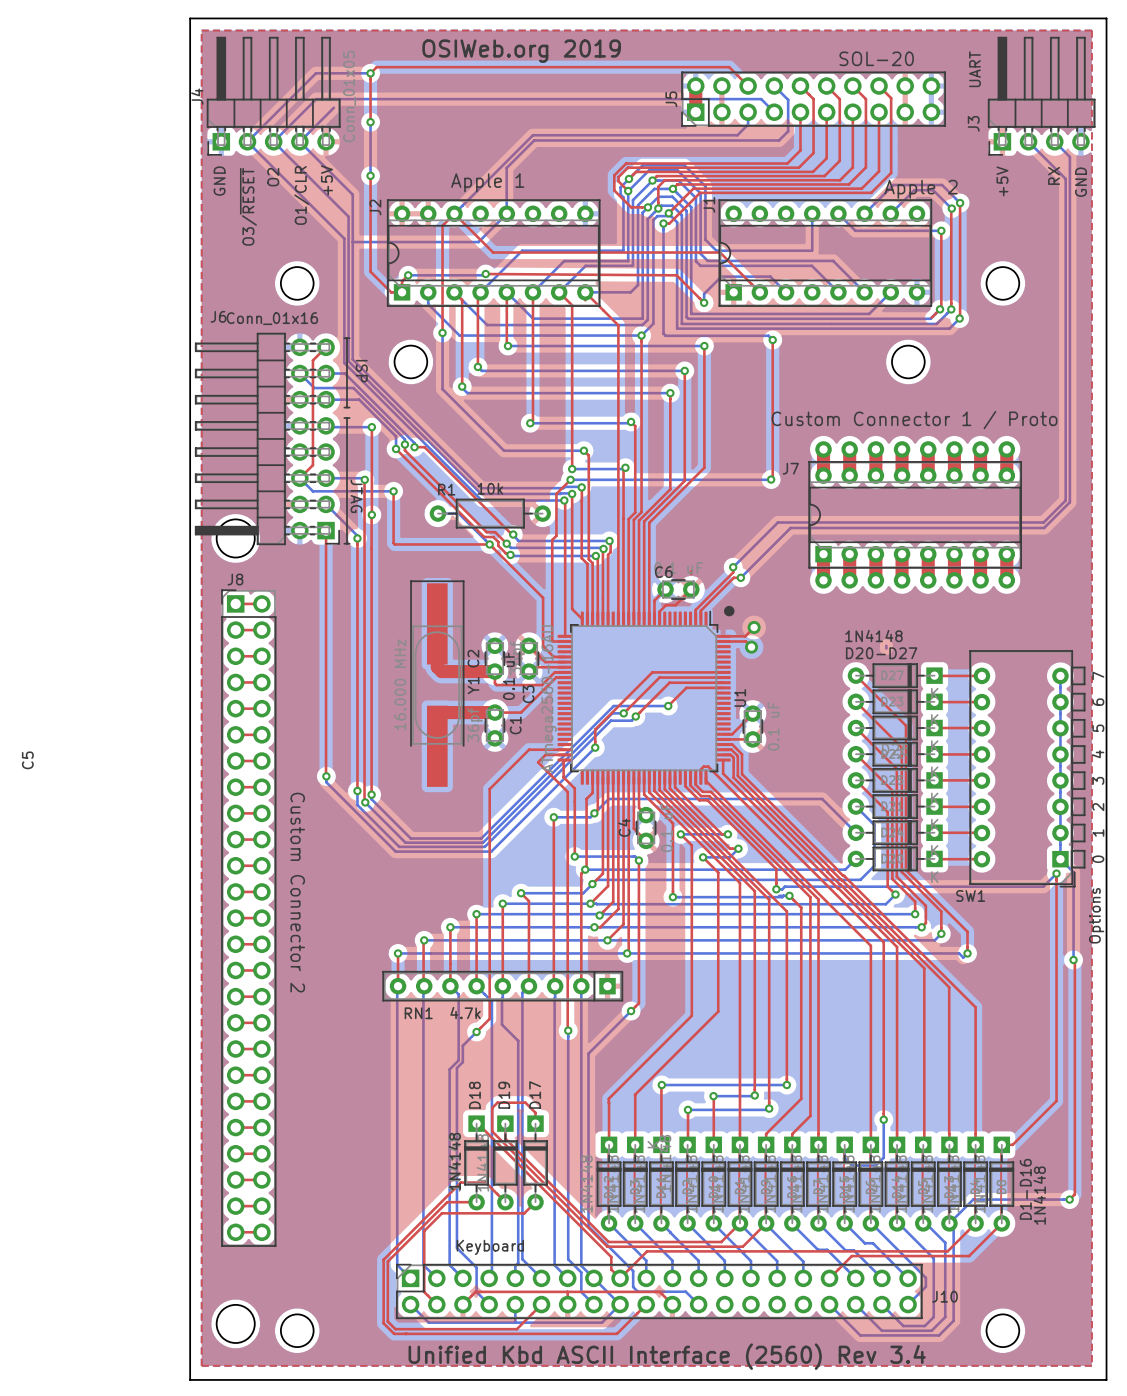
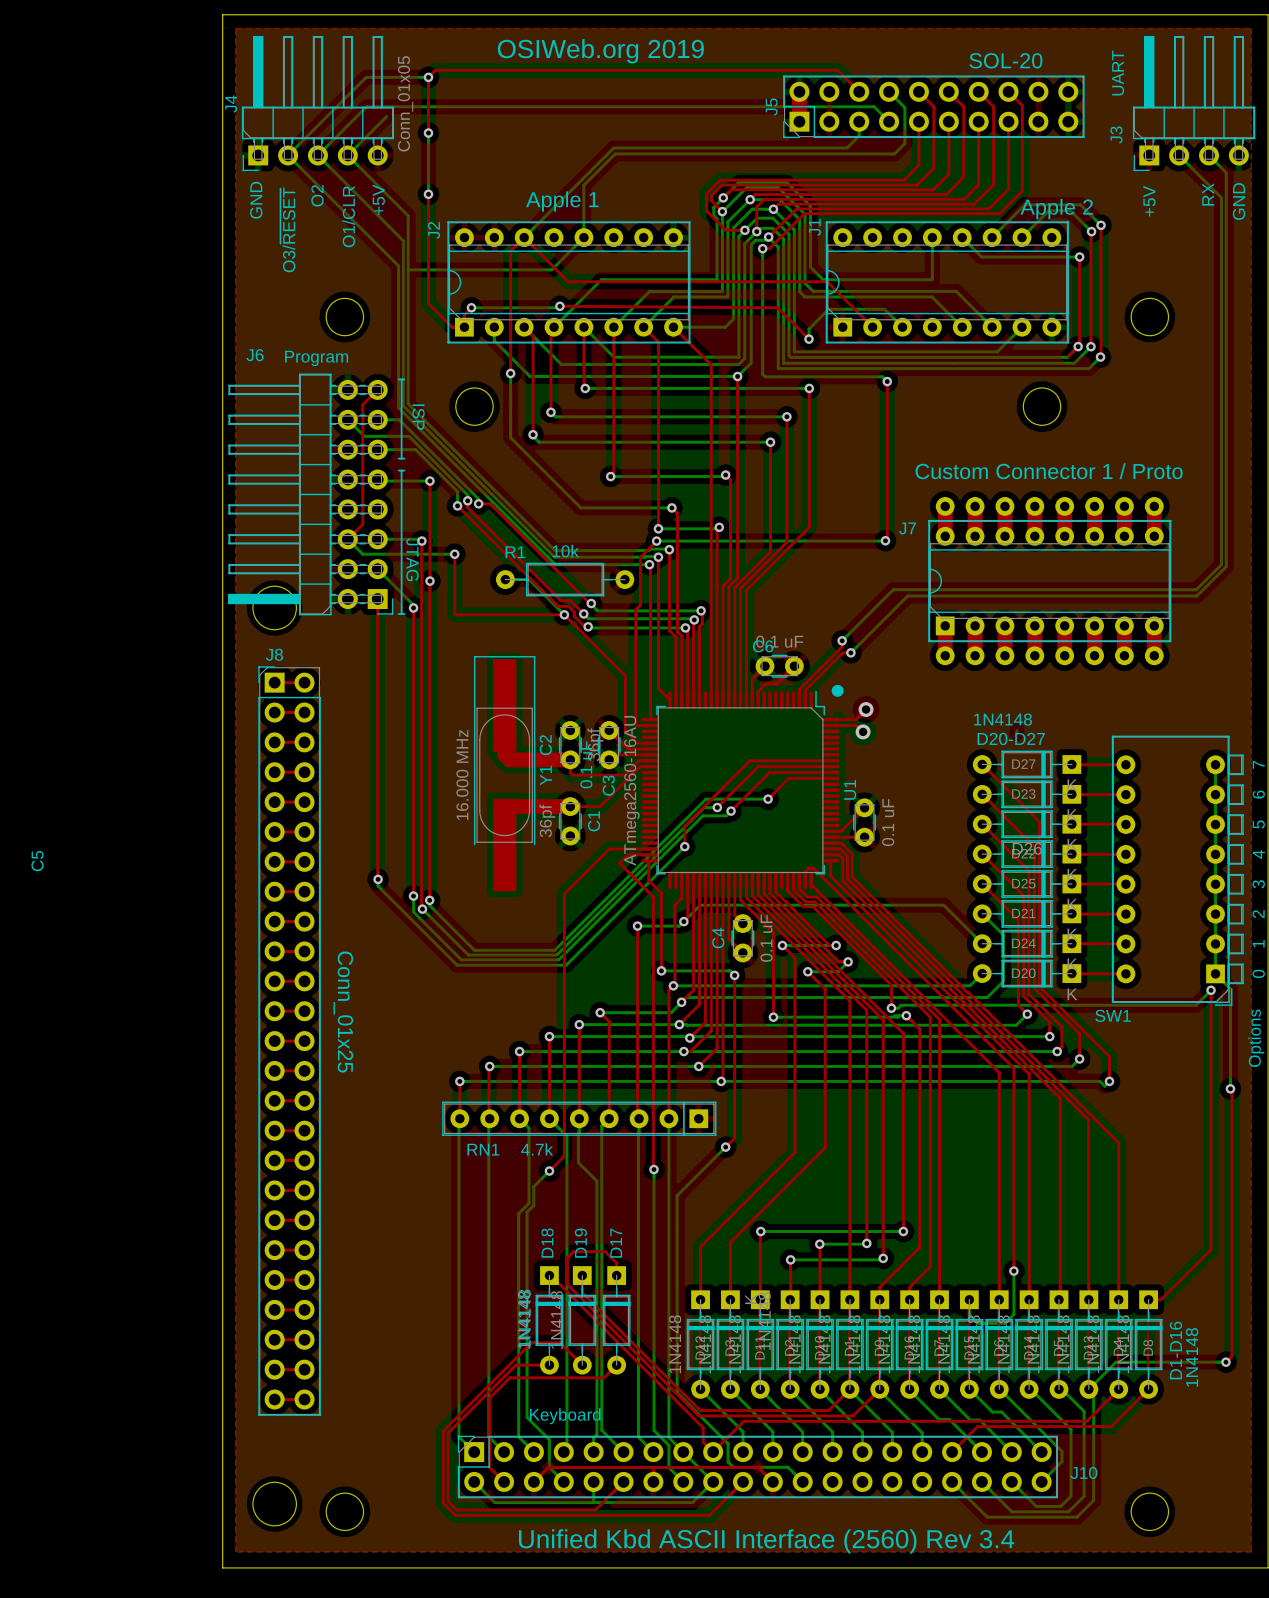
J6 value: Conn_01x16 (272, 318) -> Program (316, 358)
J8 value: Custom Connector 2 (297, 892) -> Conn_01x25 (343, 1012)

